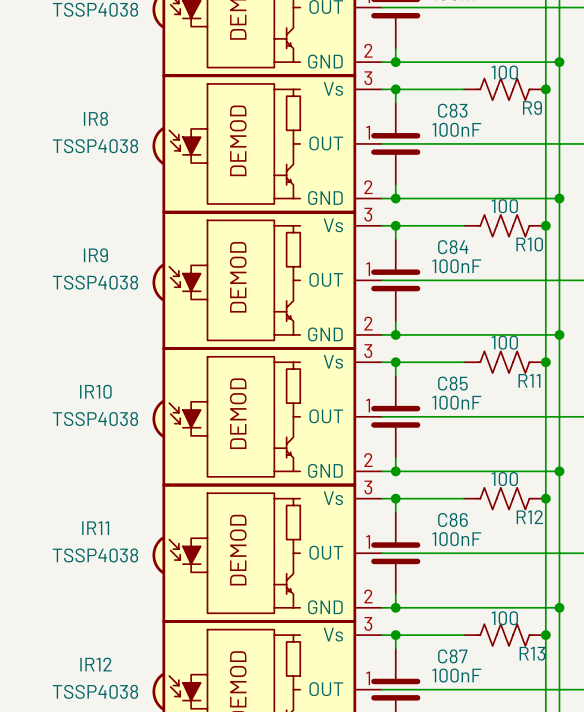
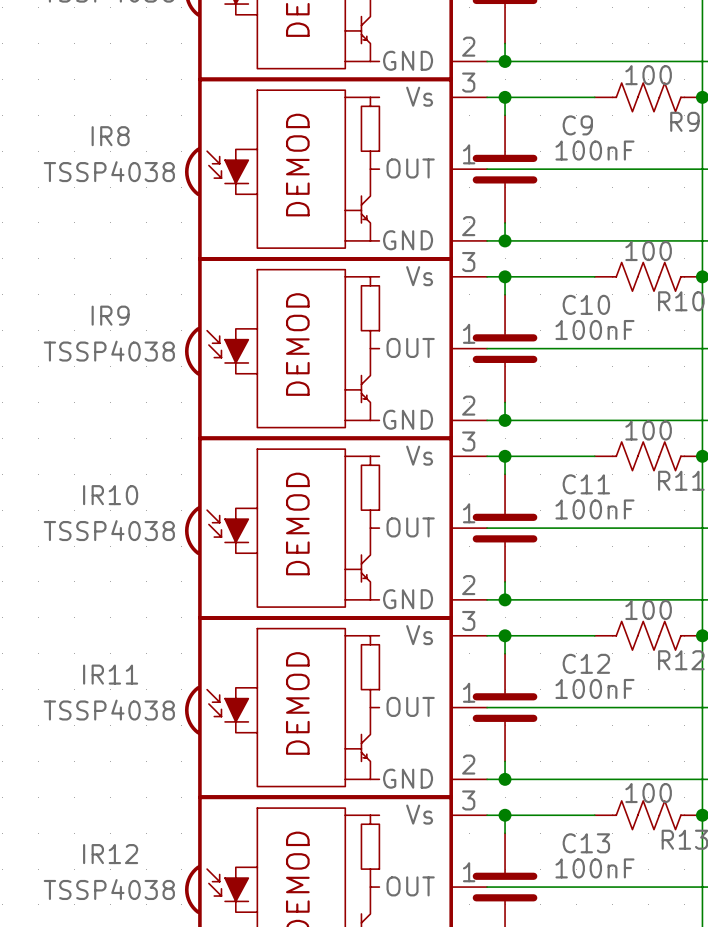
C83 name: C83 (452, 110) -> C9 (577, 125)
C84 name: C84 (453, 247) -> C10 (586, 304)
C85 name: C85 (452, 383) -> C11 (586, 484)
C86 name: C86 (452, 519) -> C12 (586, 663)
C87 name: C87 (452, 656) -> C13 (586, 843)

